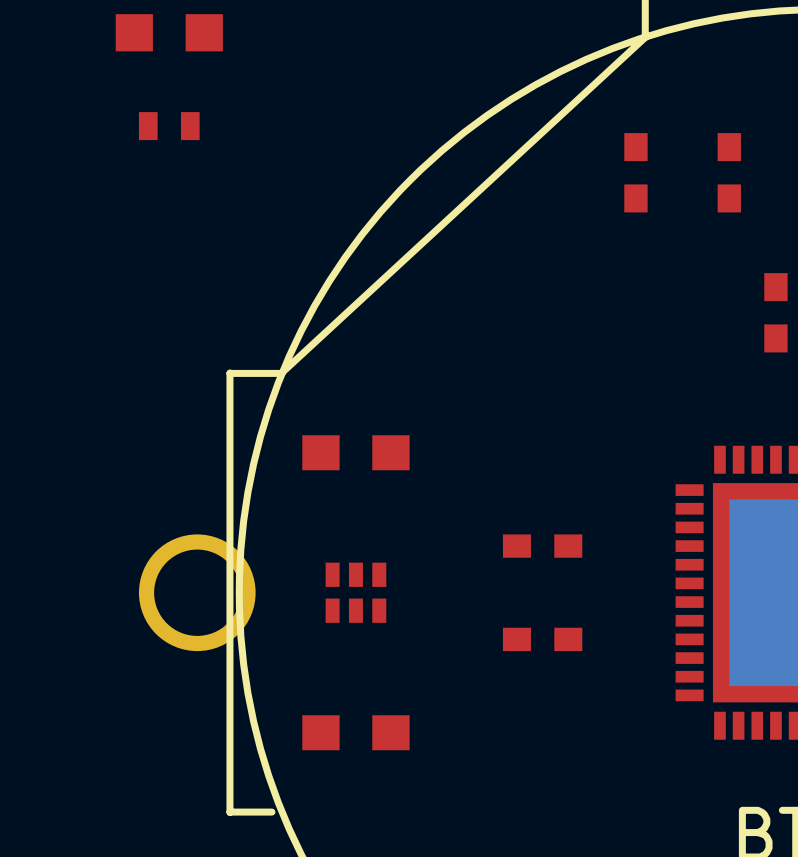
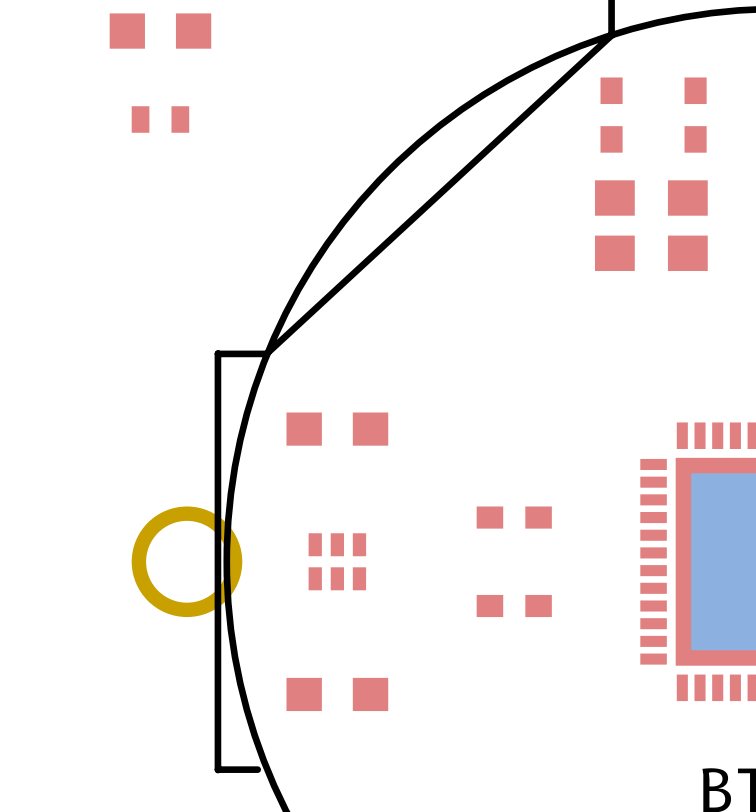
part: none -> (611, 115)
part: none -> (695, 115)
part: (635, 172) -> none
part: (729, 172) -> none
part: none -> (651, 225)
part: (775, 312) -> none

